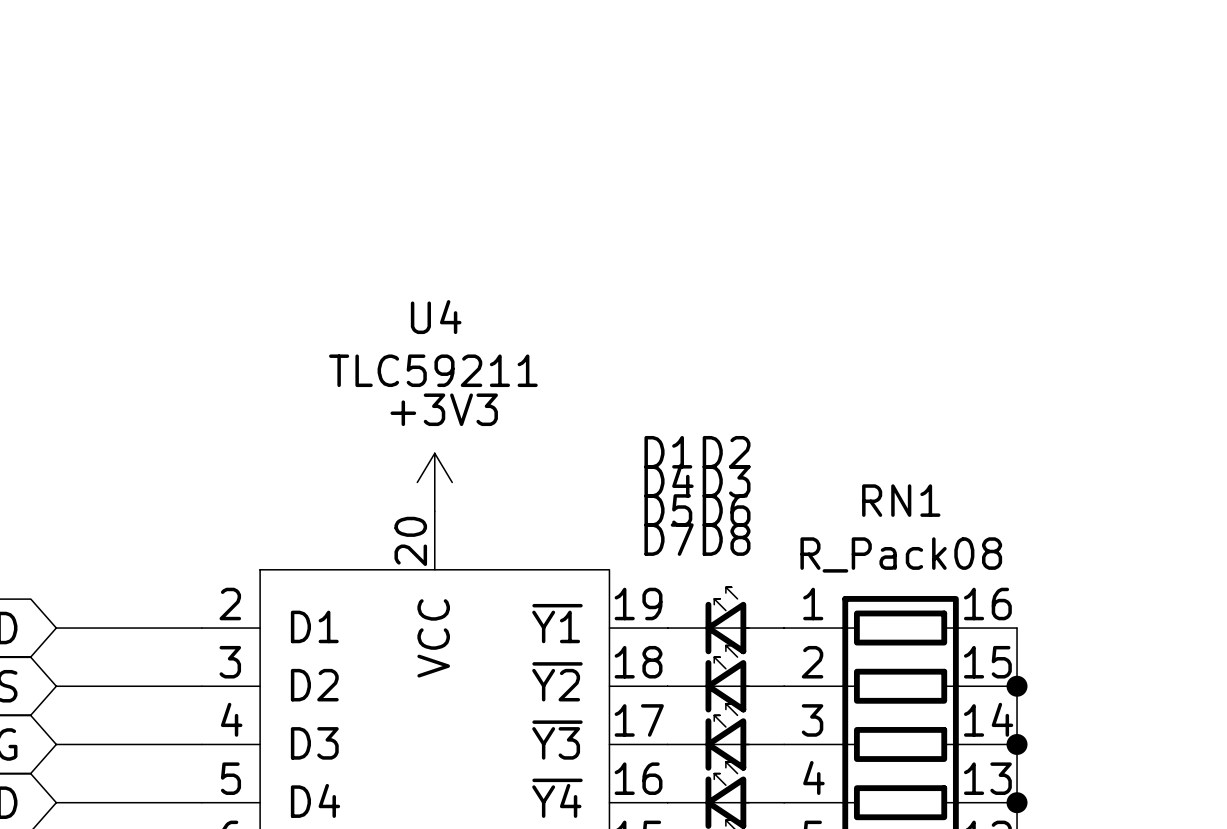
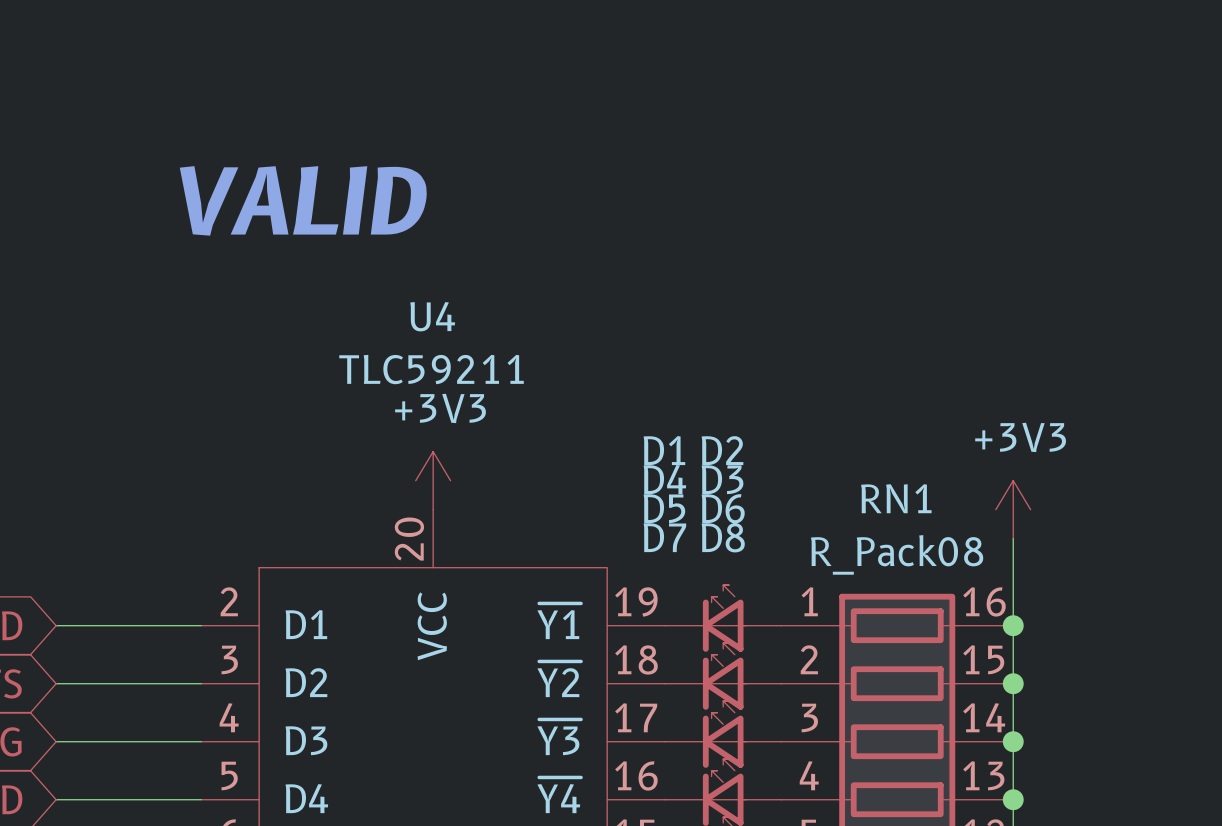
text: none -> VALID (303, 200)
power symbol: none -> +3V3 (1013, 509)
wire: none -> (1013, 538) (1013, 625)
junction: none -> (1013, 625)

